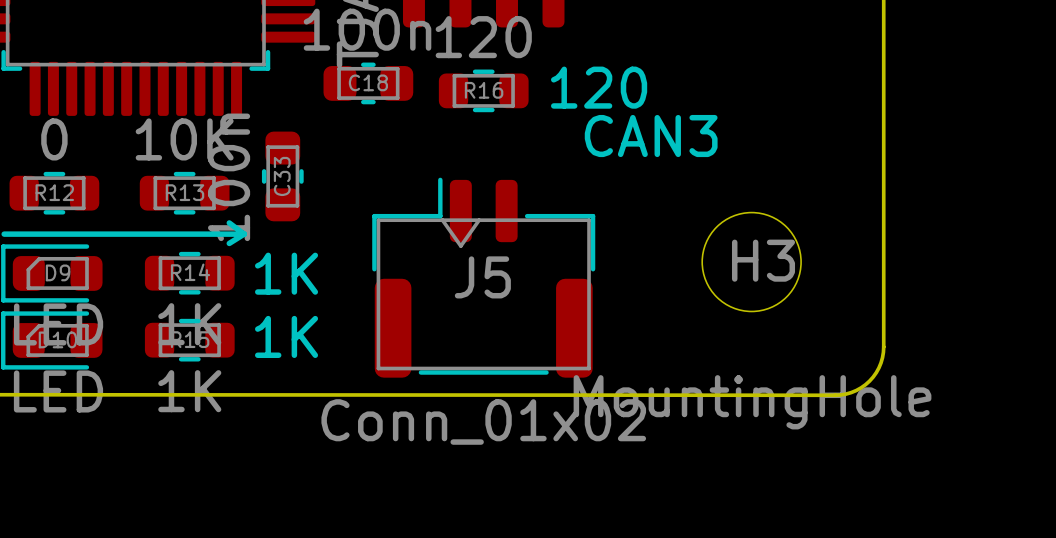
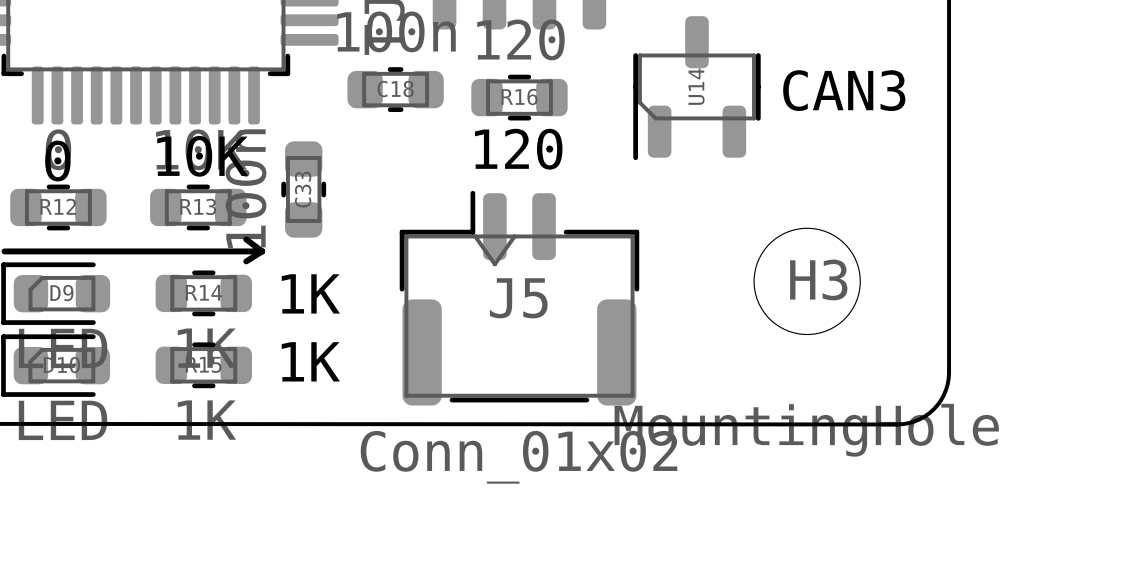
U14: none -> (696, 88)
text position: 120 (599, 87) -> 120 (518, 149)
text position: CAN3 (651, 136) -> CAN3 (844, 90)
text: none -> 10K (202, 156)
text: none -> 0 (57, 161)

